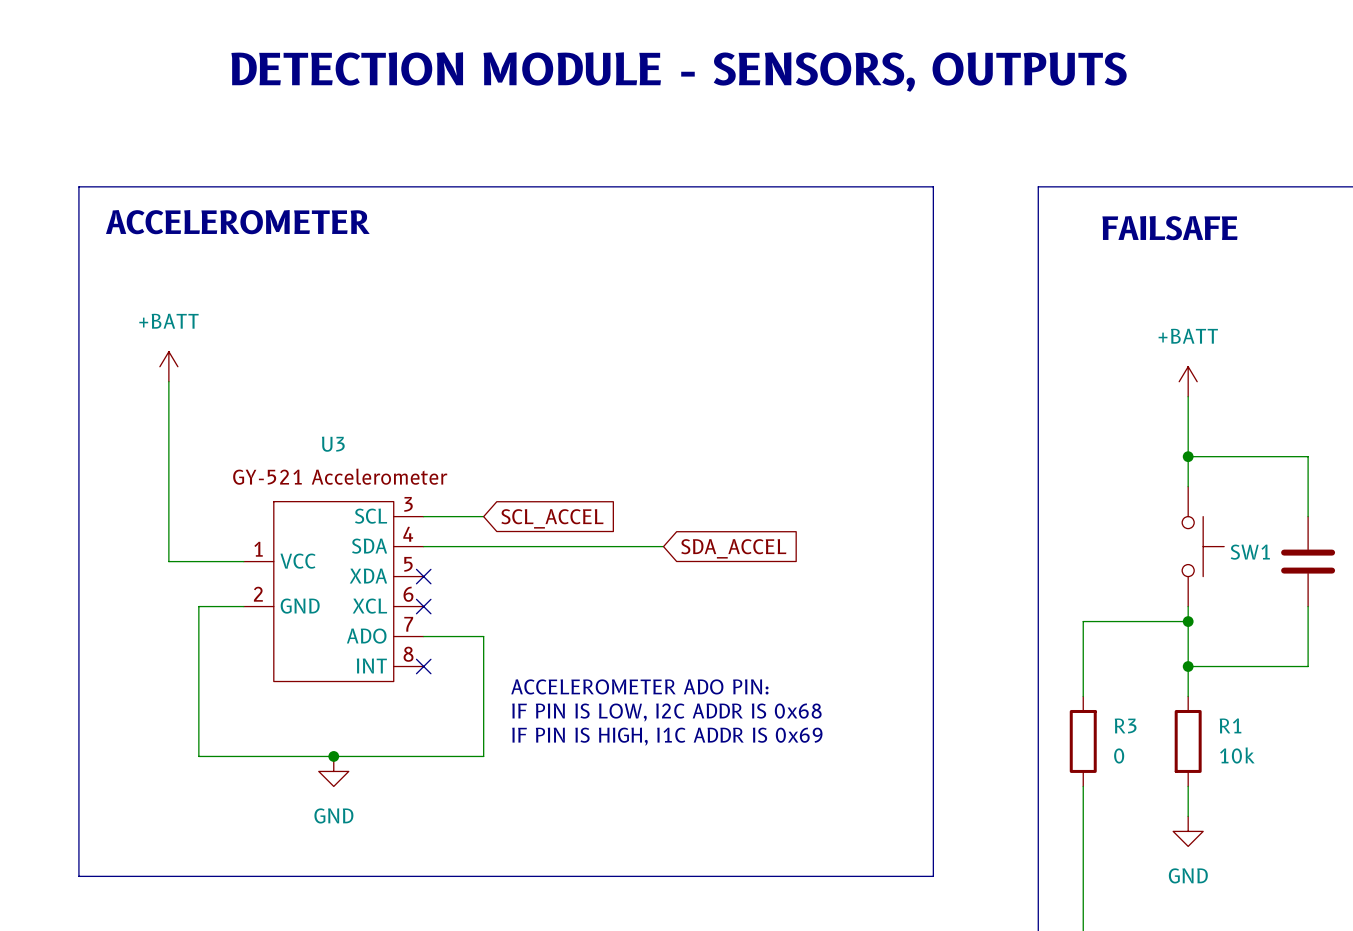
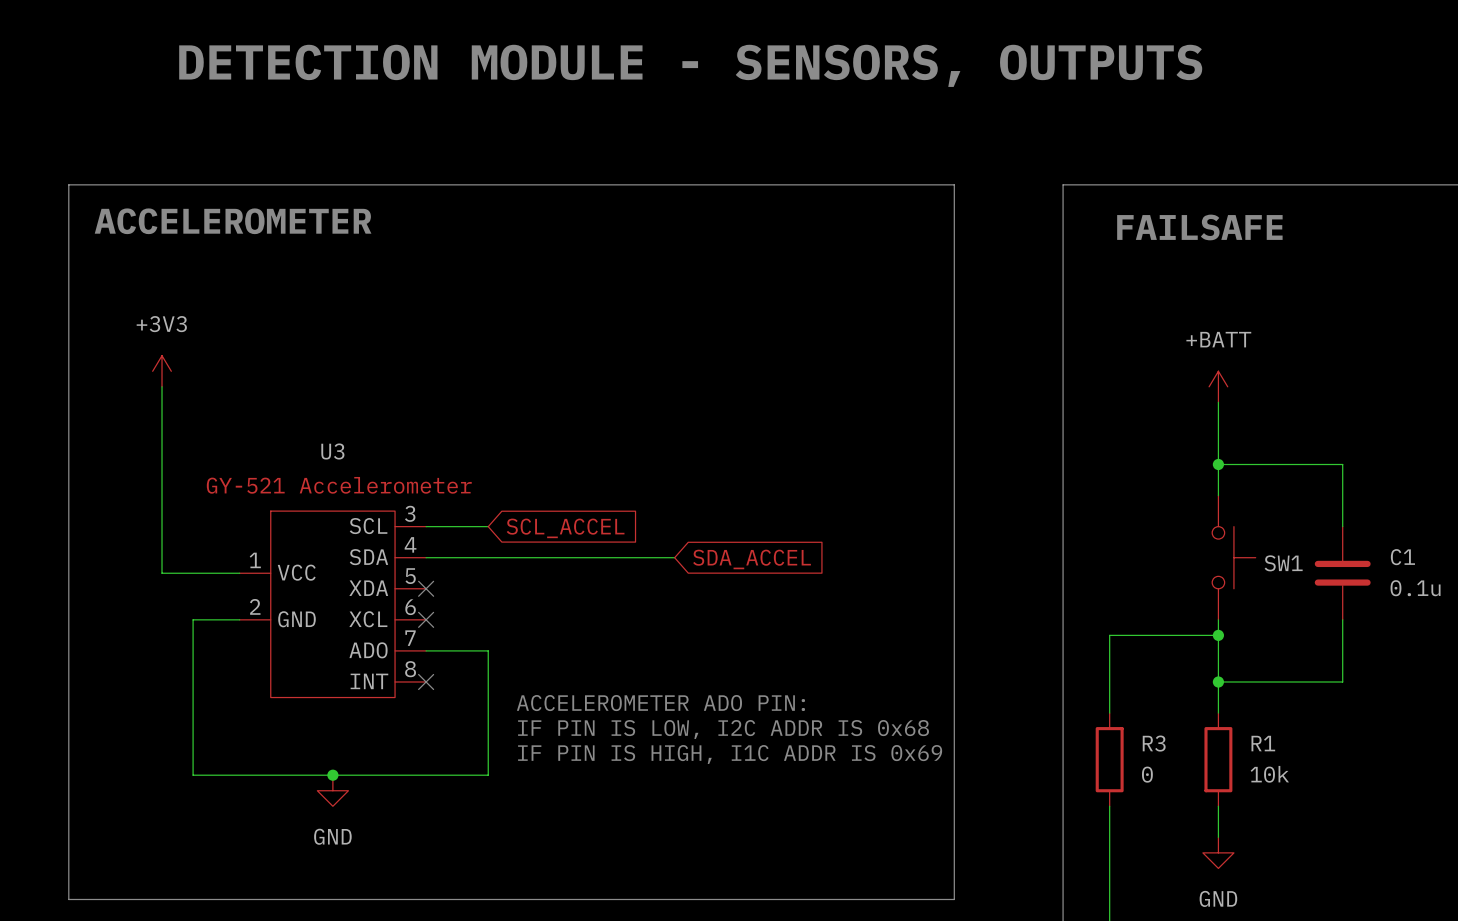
power symbol: +BATT (168, 366) -> +3V3 (162, 371)

